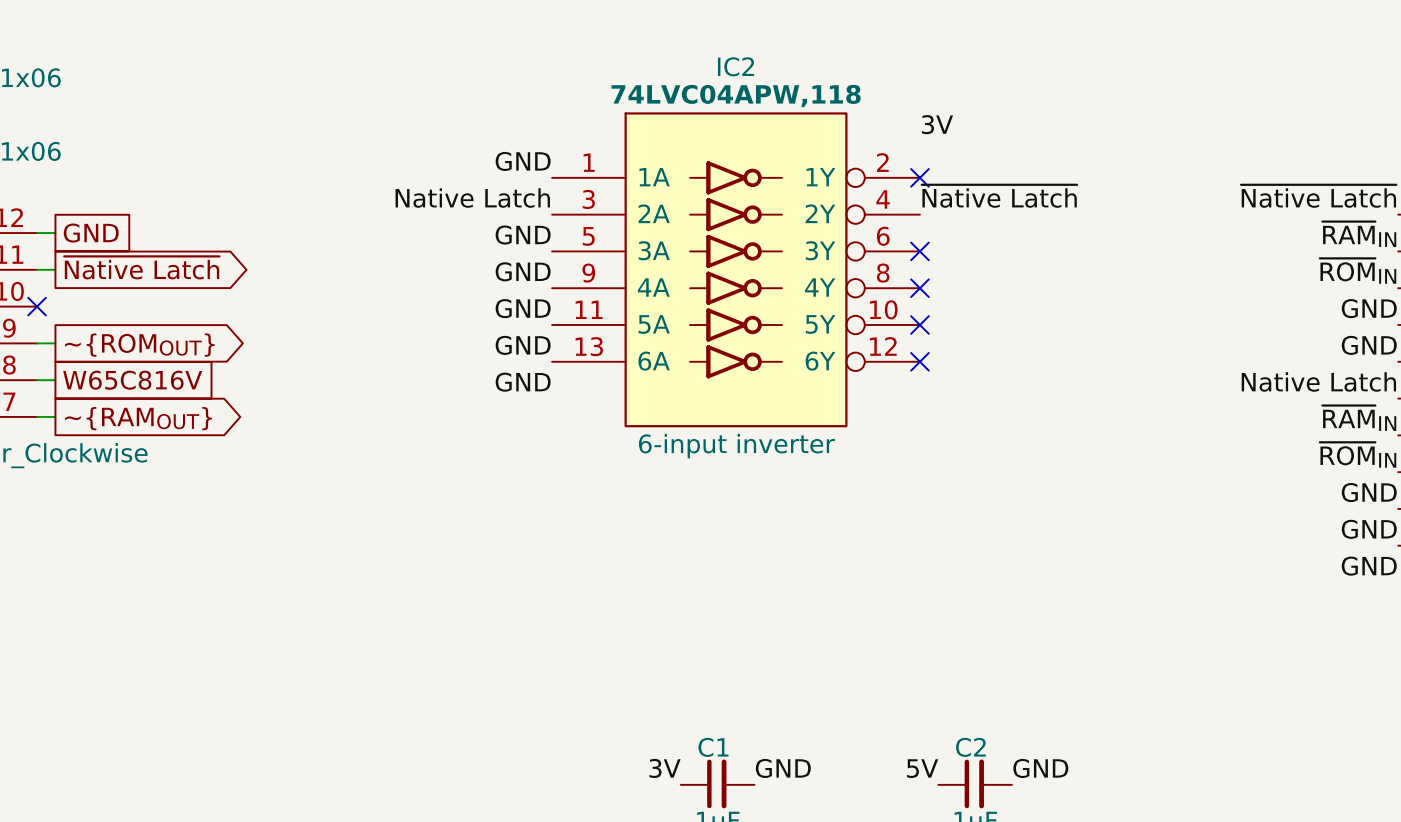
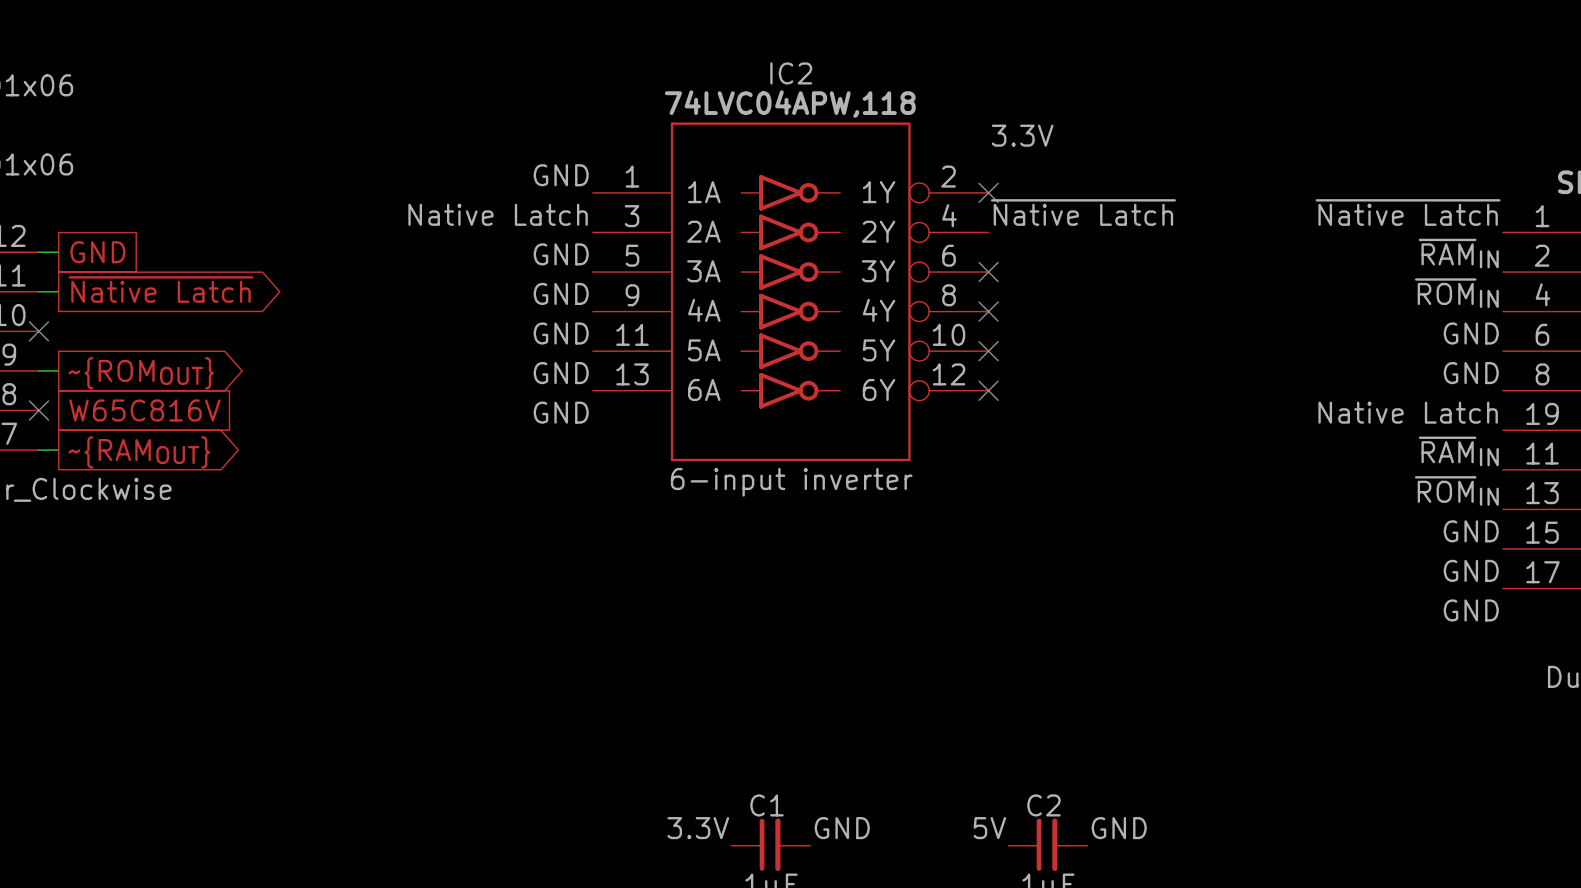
label: 3V (937, 124) -> 3.3V (1022, 135)
wire: (37, 380) (55, 380) -> none
no-connect mark: none -> (38, 410)
label: 3V (665, 768) -> 3.3V (698, 828)

